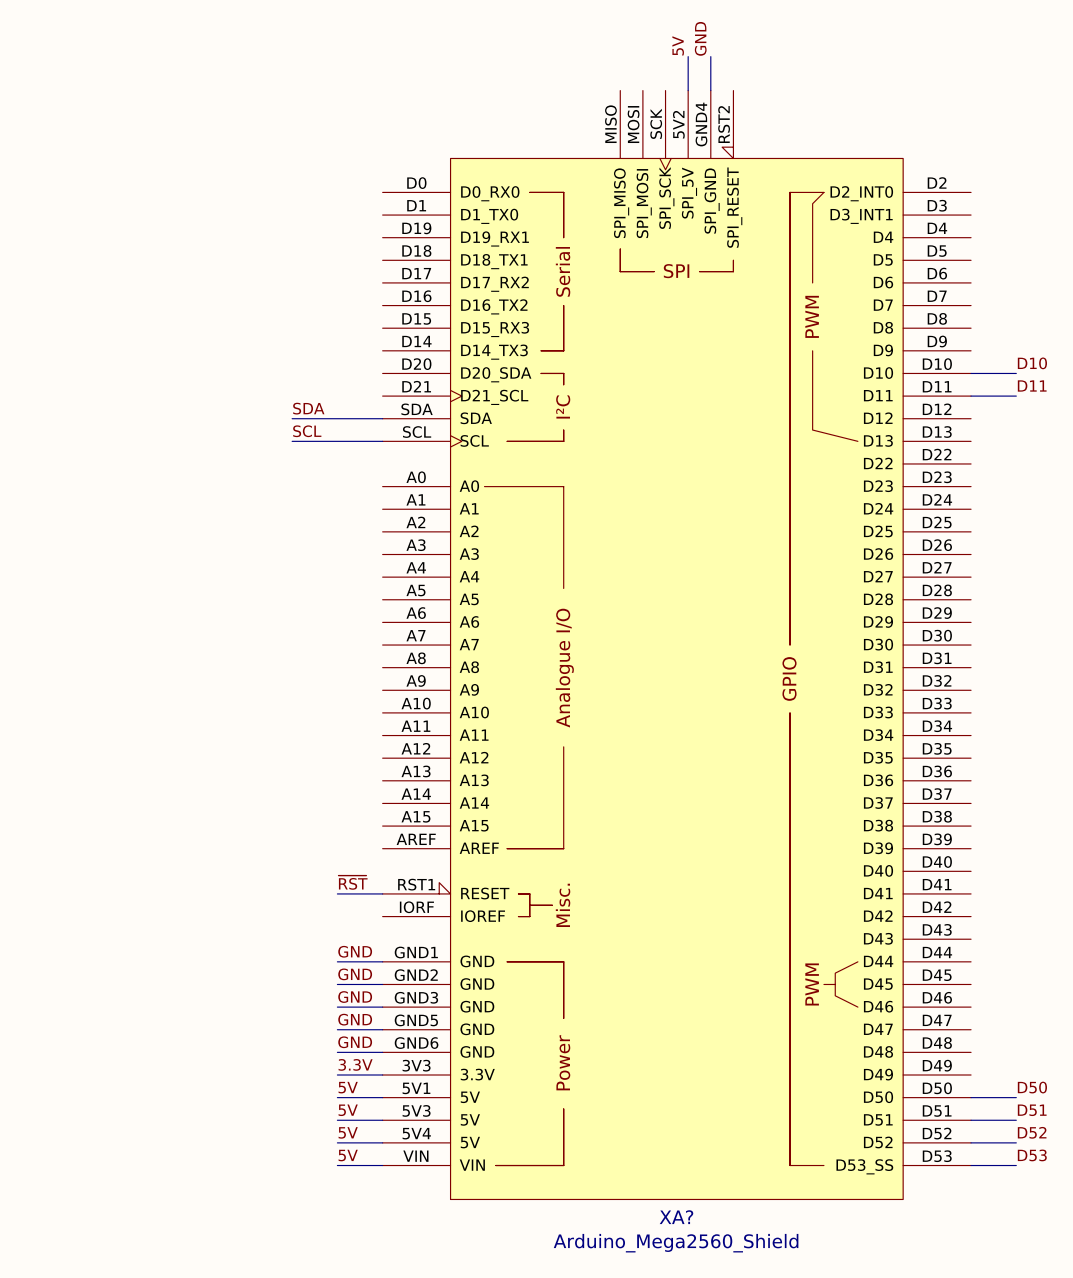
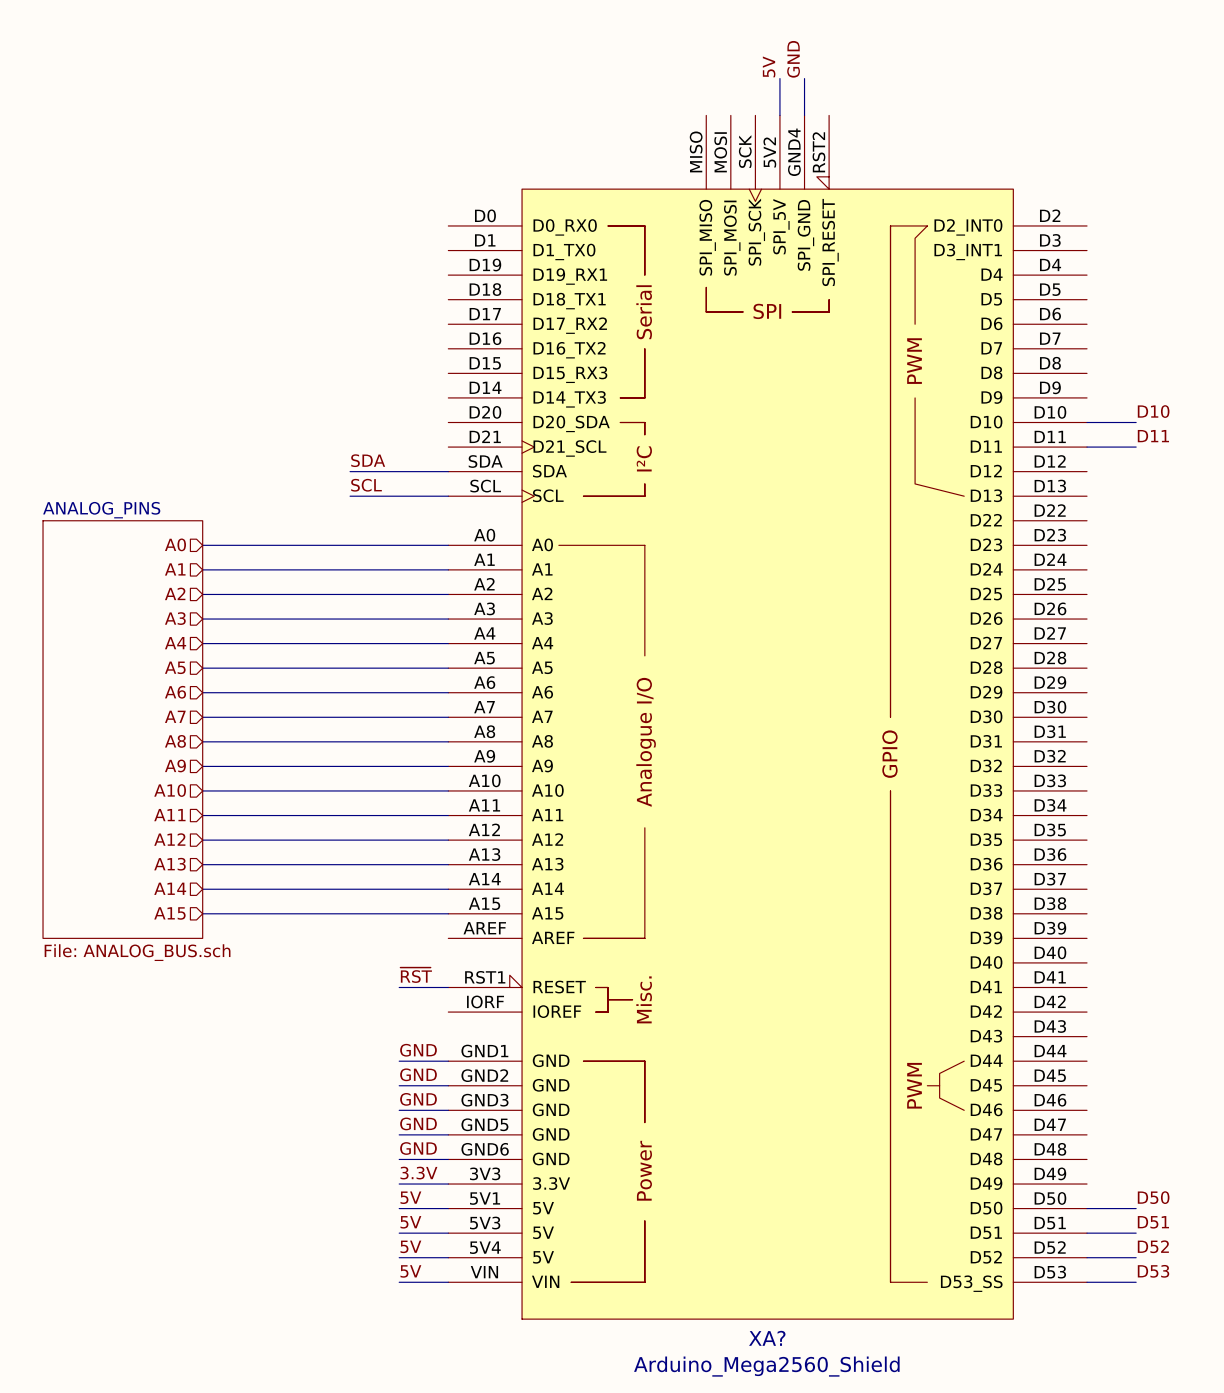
hierarchical label: none -> A0 (175, 544)
wire: none -> (202, 545) (448, 545)
hierarchical label: none -> A1 (175, 569)
wire: none -> (202, 569) (448, 569)
hierarchical label: none -> A2 (175, 593)
wire: none -> (202, 594) (448, 594)
hierarchical label: none -> A3 (175, 618)
wire: none -> (202, 619) (448, 619)
hierarchical label: none -> A4 (175, 643)
wire: none -> (202, 643) (448, 643)
hierarchical label: none -> A5 (175, 667)
wire: none -> (202, 668) (448, 668)
hierarchical label: none -> A6 (175, 692)
wire: none -> (202, 692) (448, 692)
hierarchical label: none -> A7 (175, 716)
wire: none -> (202, 717) (448, 717)
sheet ANALOG_PINS: none -> File: ANALOG_BUS.sch (122, 729)
hierarchical label: none -> A8 (175, 741)
wire: none -> (202, 741) (448, 741)
hierarchical label: none -> A9 (175, 765)
wire: none -> (202, 766) (448, 766)
hierarchical label: none -> A10 (170, 790)
wire: none -> (202, 790) (448, 790)
hierarchical label: none -> A11 (169, 815)
wire: none -> (202, 815) (448, 815)
hierarchical label: none -> A12 (169, 839)
wire: none -> (202, 840) (448, 840)
hierarchical label: none -> A13 (169, 864)
wire: none -> (202, 864) (448, 864)
hierarchical label: none -> A14 (170, 888)
wire: none -> (202, 889) (448, 889)
hierarchical label: none -> A15 (169, 913)
wire: none -> (202, 913) (448, 913)

